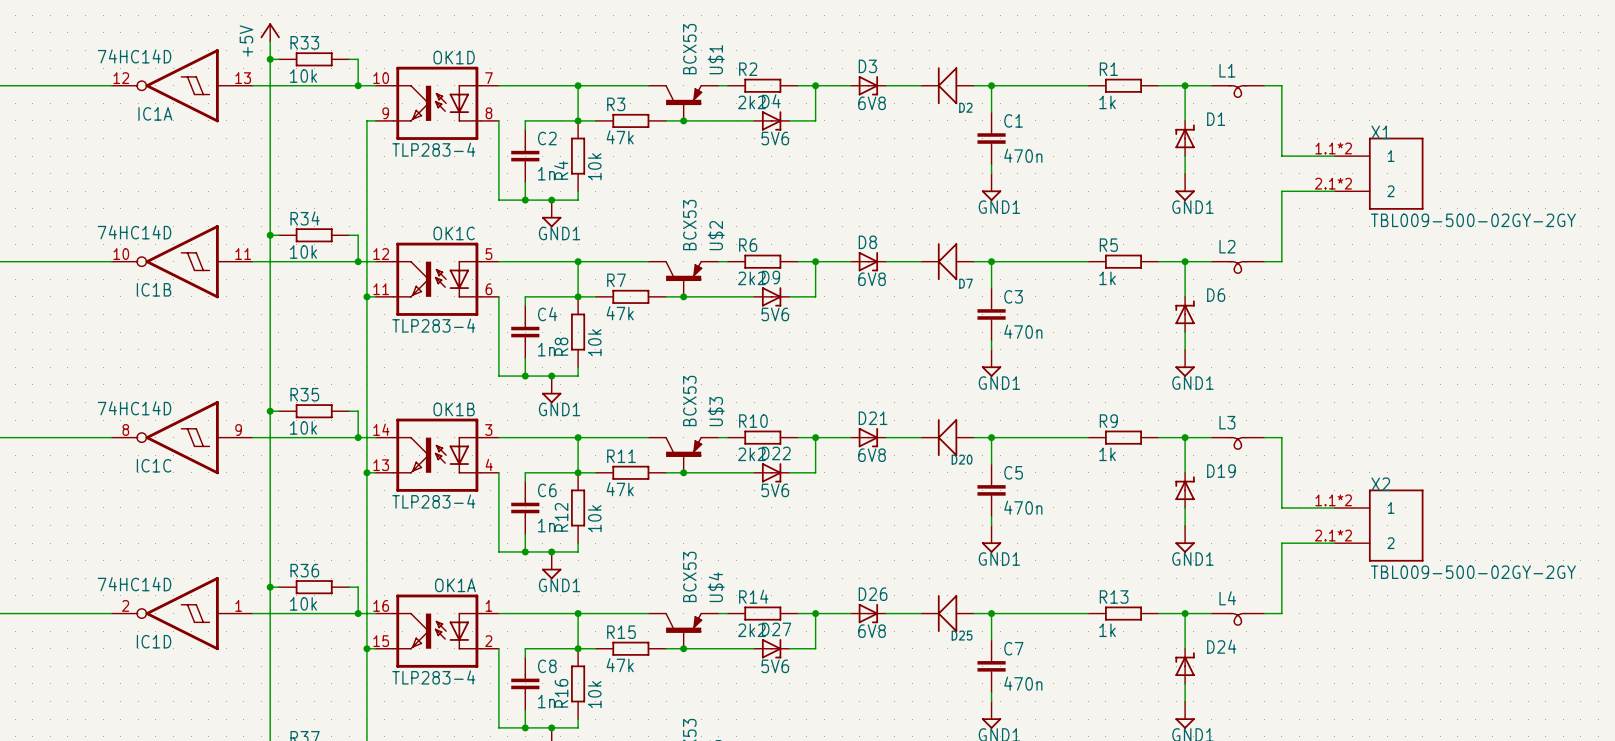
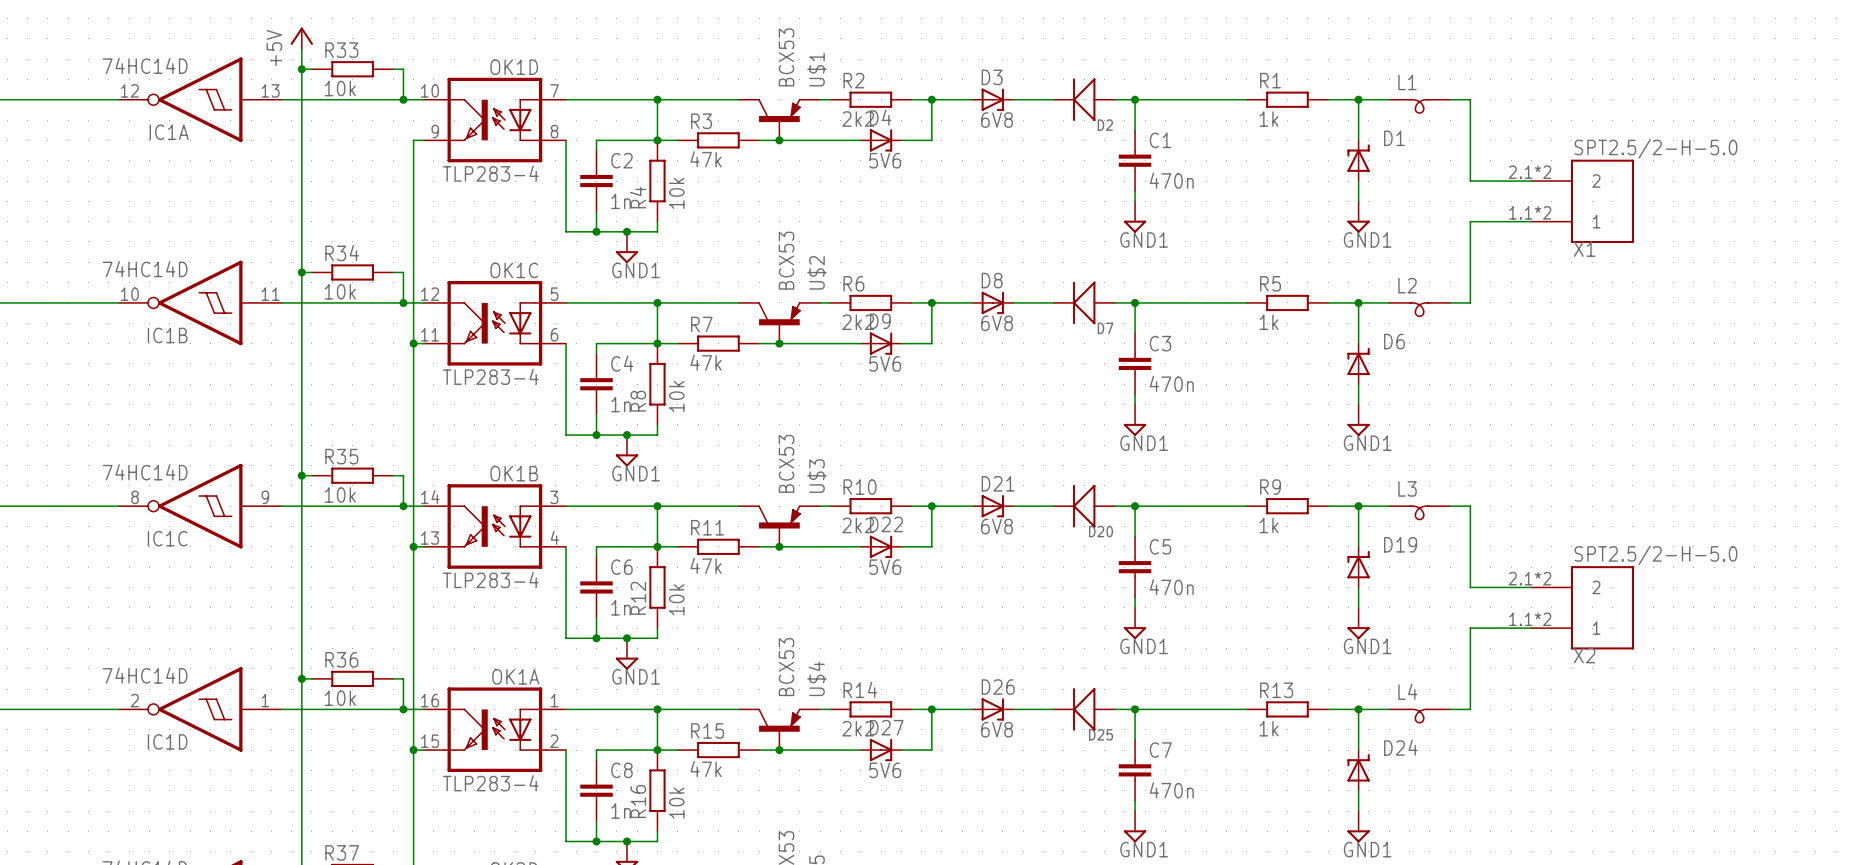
X1 flip: as is (1396, 173) -> up-down (1602, 201)
X1 value: TBL009-500-02GY-2GY (1473, 220) -> SPT2.5/2-H-5.0 (1655, 148)
X2 flip: as is (1396, 525) -> up-down (1602, 607)
X2 value: TBL009-500-02GY-2GY (1473, 572) -> SPT2.5/2-H-5.0 (1655, 555)

